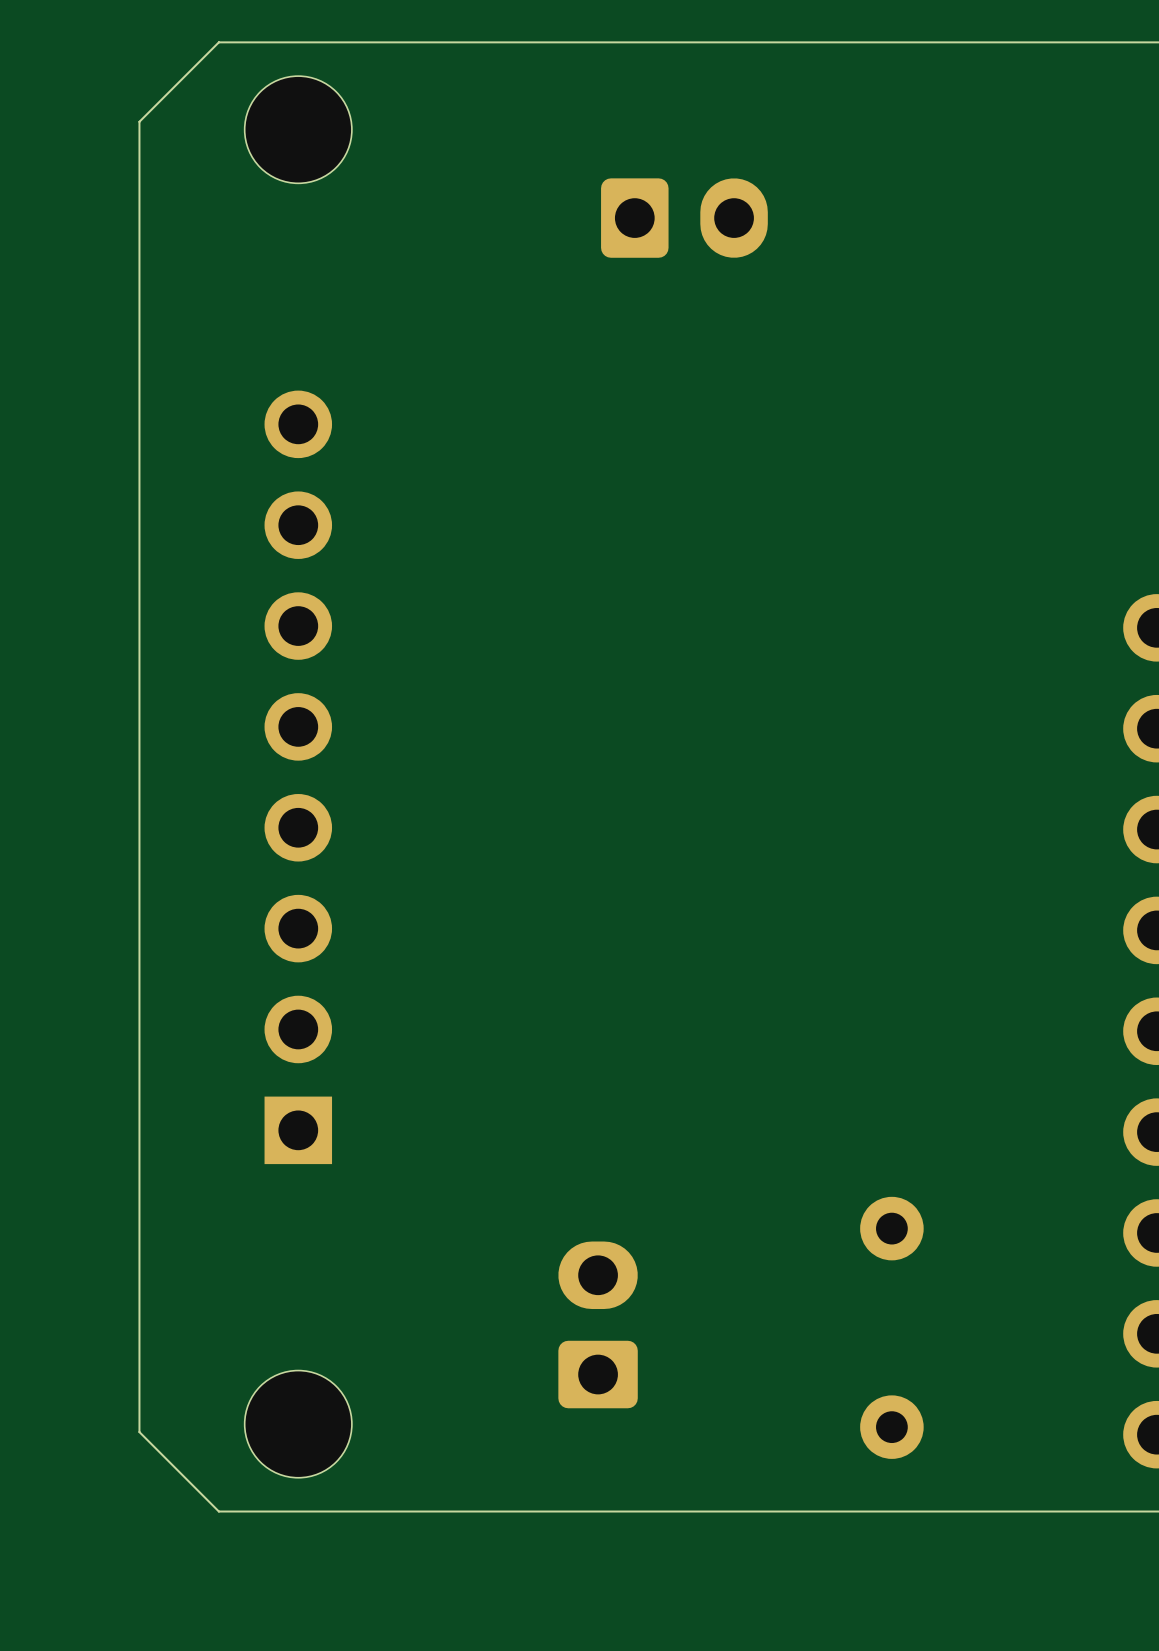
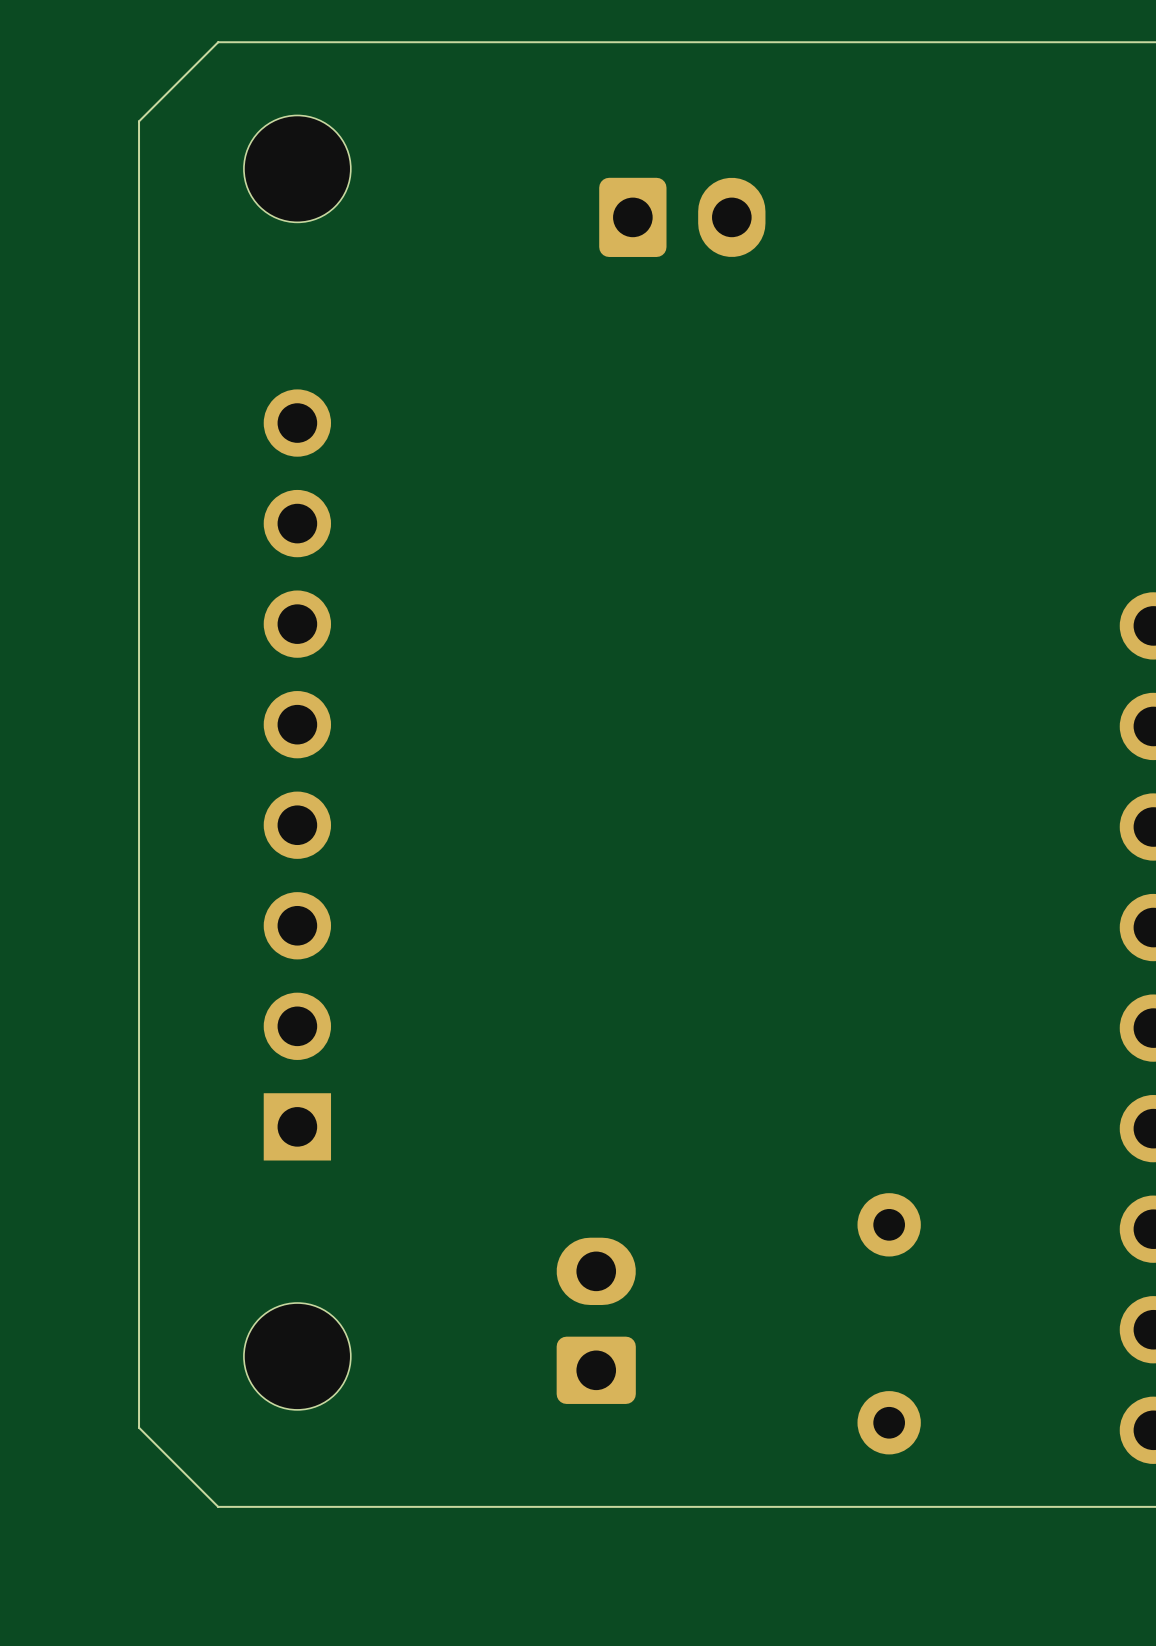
part position: (298, 129) -> (297, 168)
part position: (298, 1424) -> (297, 1356)

